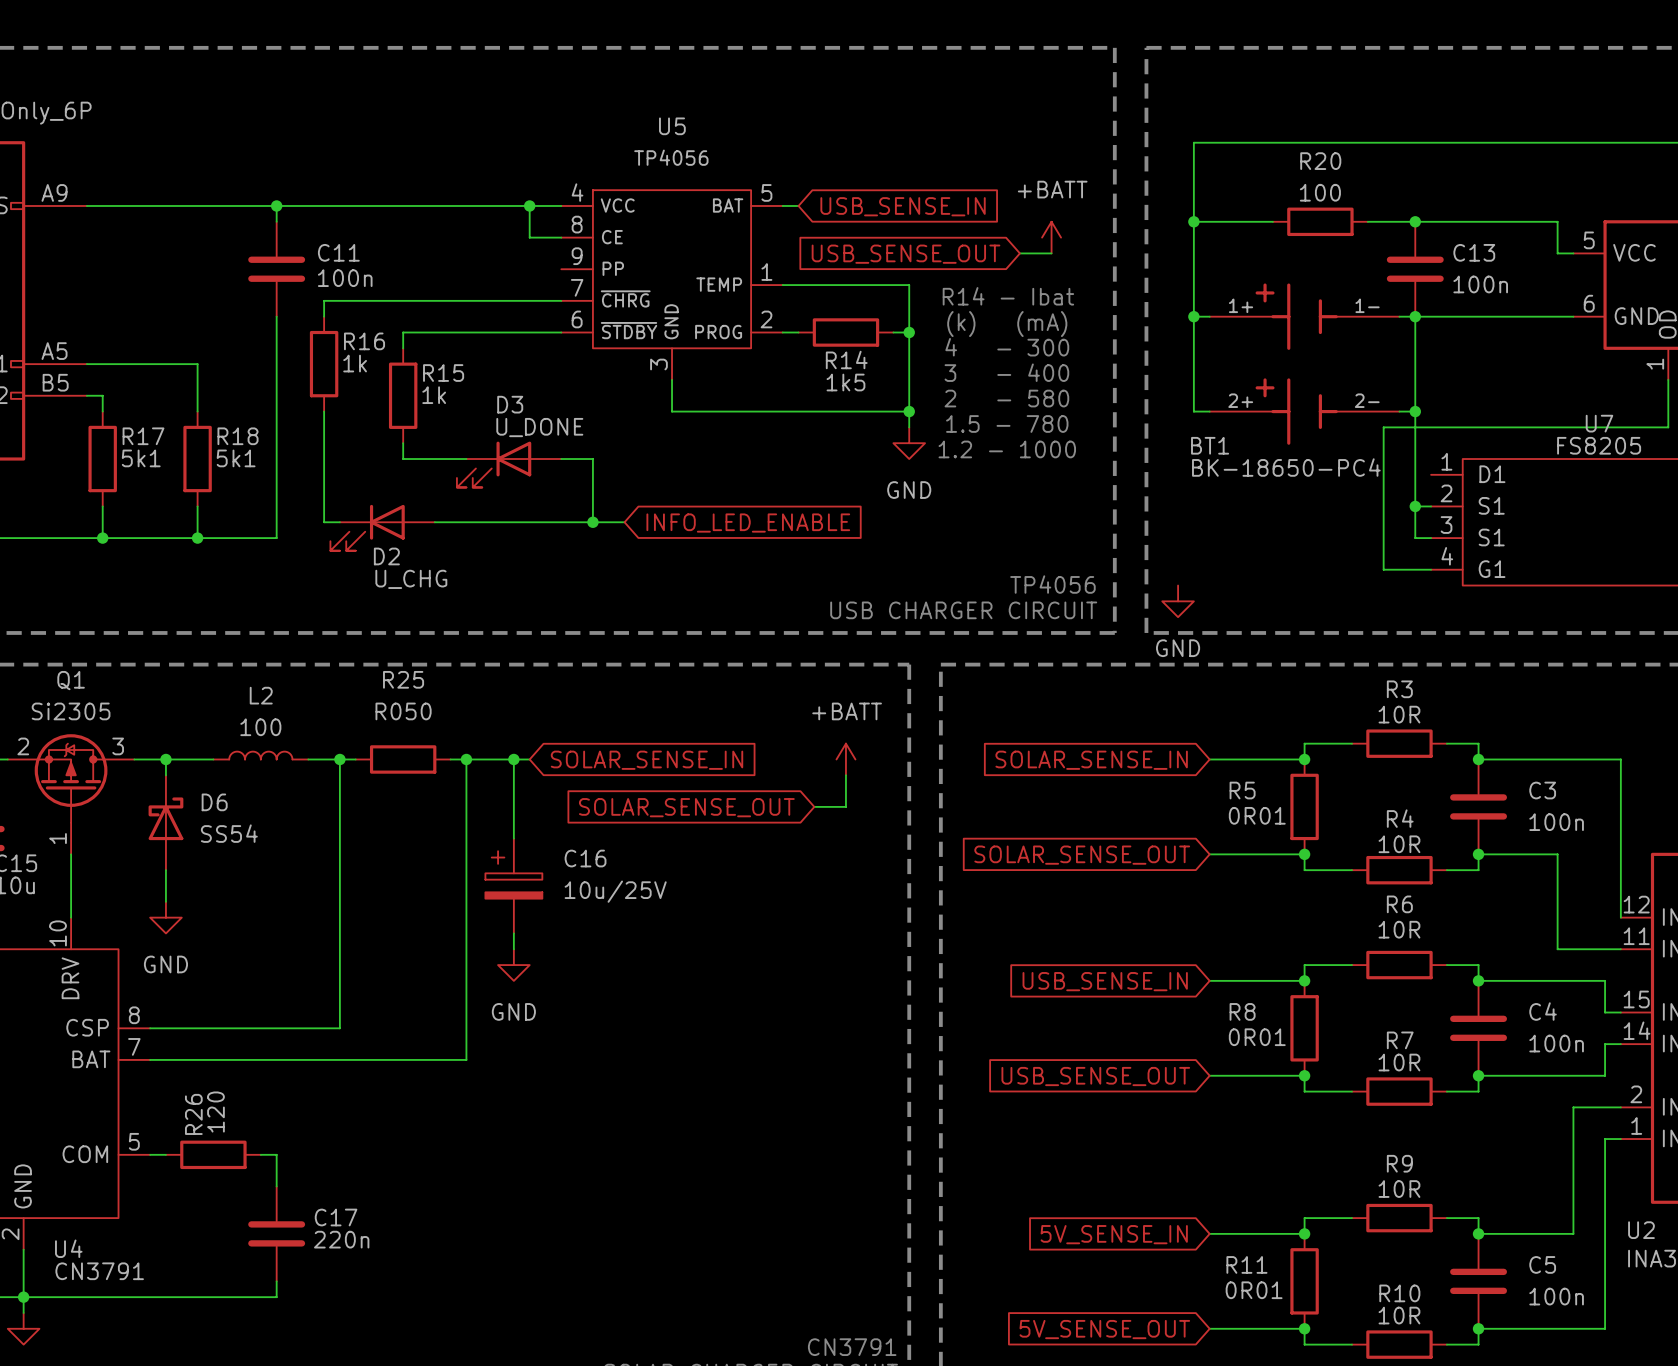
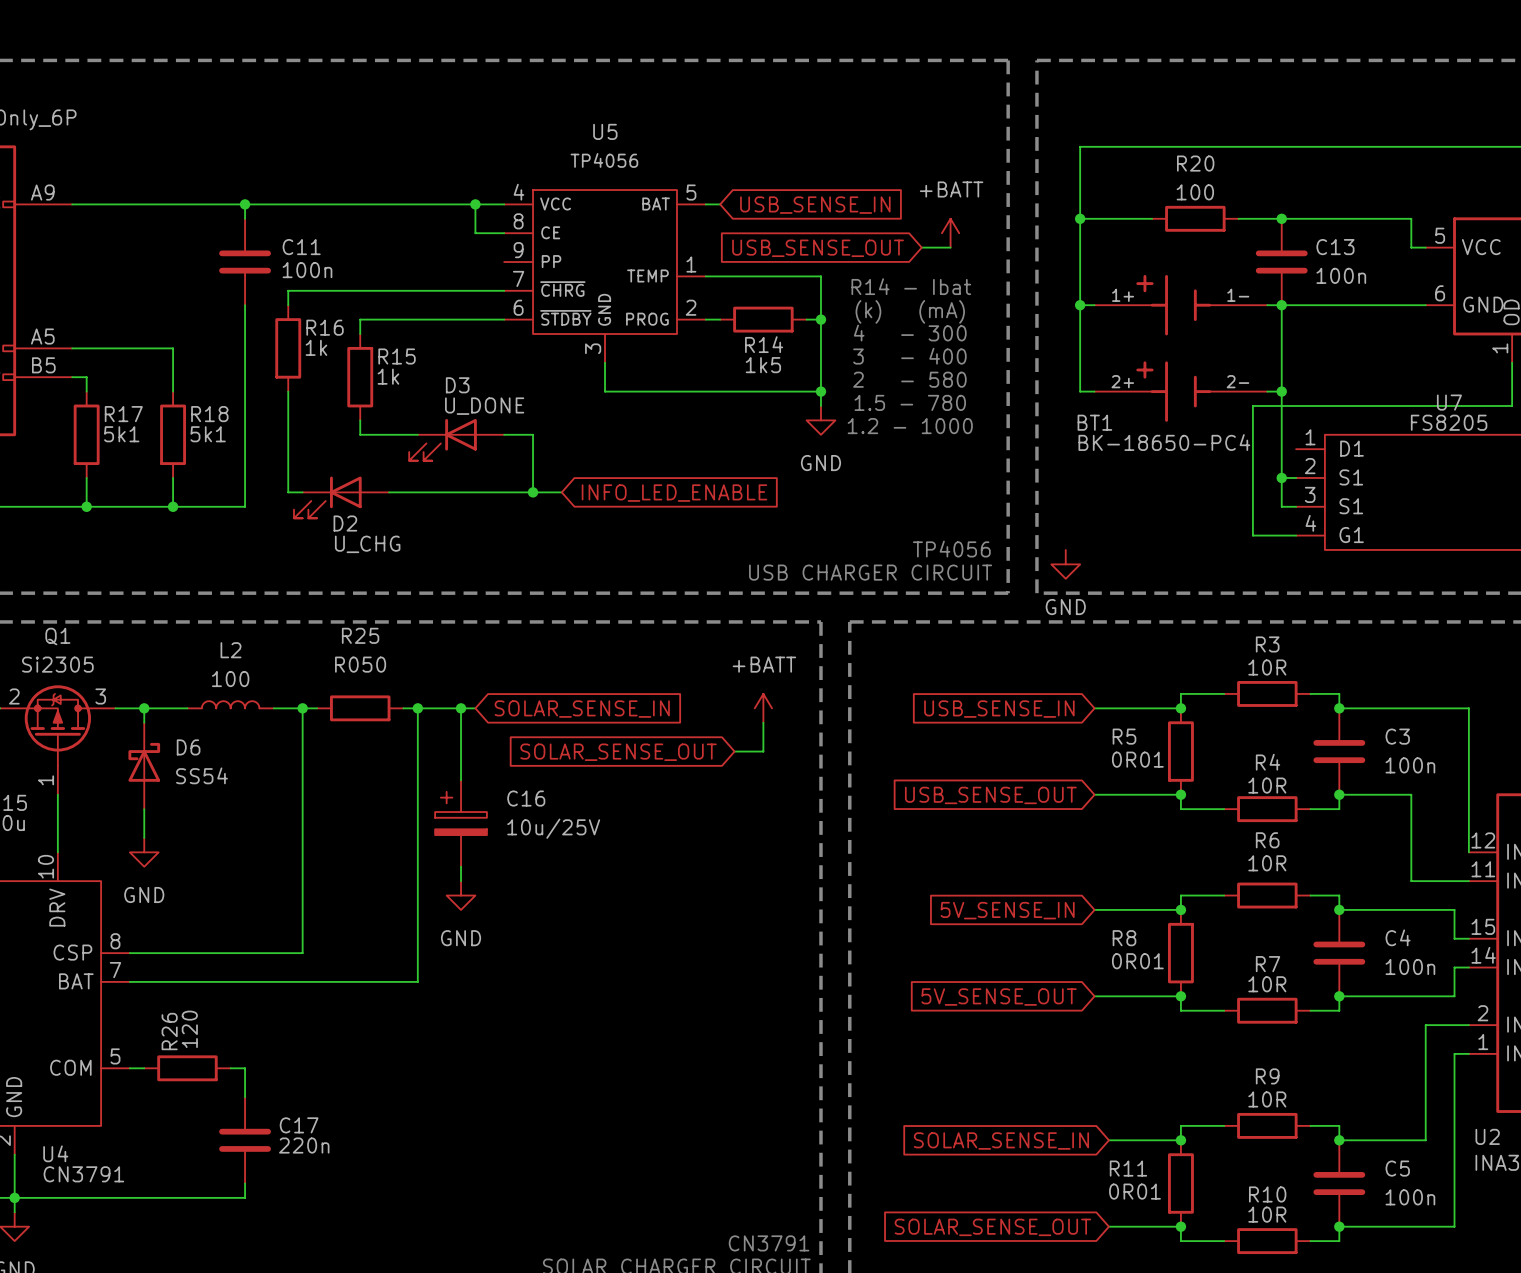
global label: SOLAR_SENSE_IN (1091, 760) -> USB_SENSE_IN (999, 709)
global label: SOLAR_SENSE_OUT (1082, 855) -> USB_SENSE_OUT (990, 795)
global label: USB_SENSE_IN (1105, 981) -> 5V_SENSE_IN (1007, 910)
global label: USB_SENSE_OUT (1095, 1076) -> 5V_SENSE_OUT (999, 997)
wire: (1209, 1233) (1225, 1233) -> none
global label: 5V_SENSE_IN (1114, 1234) -> SOLAR_SENSE_IN (1001, 1140)
wire: (1209, 1328) (1225, 1328) -> none
global label: 5V_SENSE_OUT (1104, 1329) -> SOLAR_SENSE_OUT (992, 1227)

